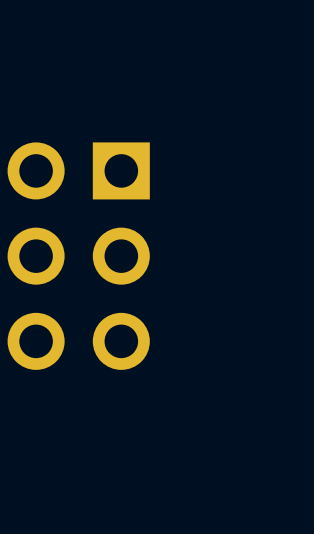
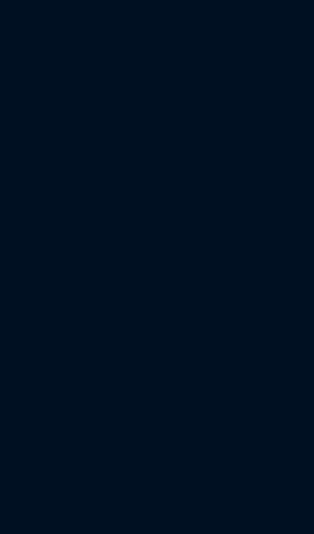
part: (78, 256) -> none

